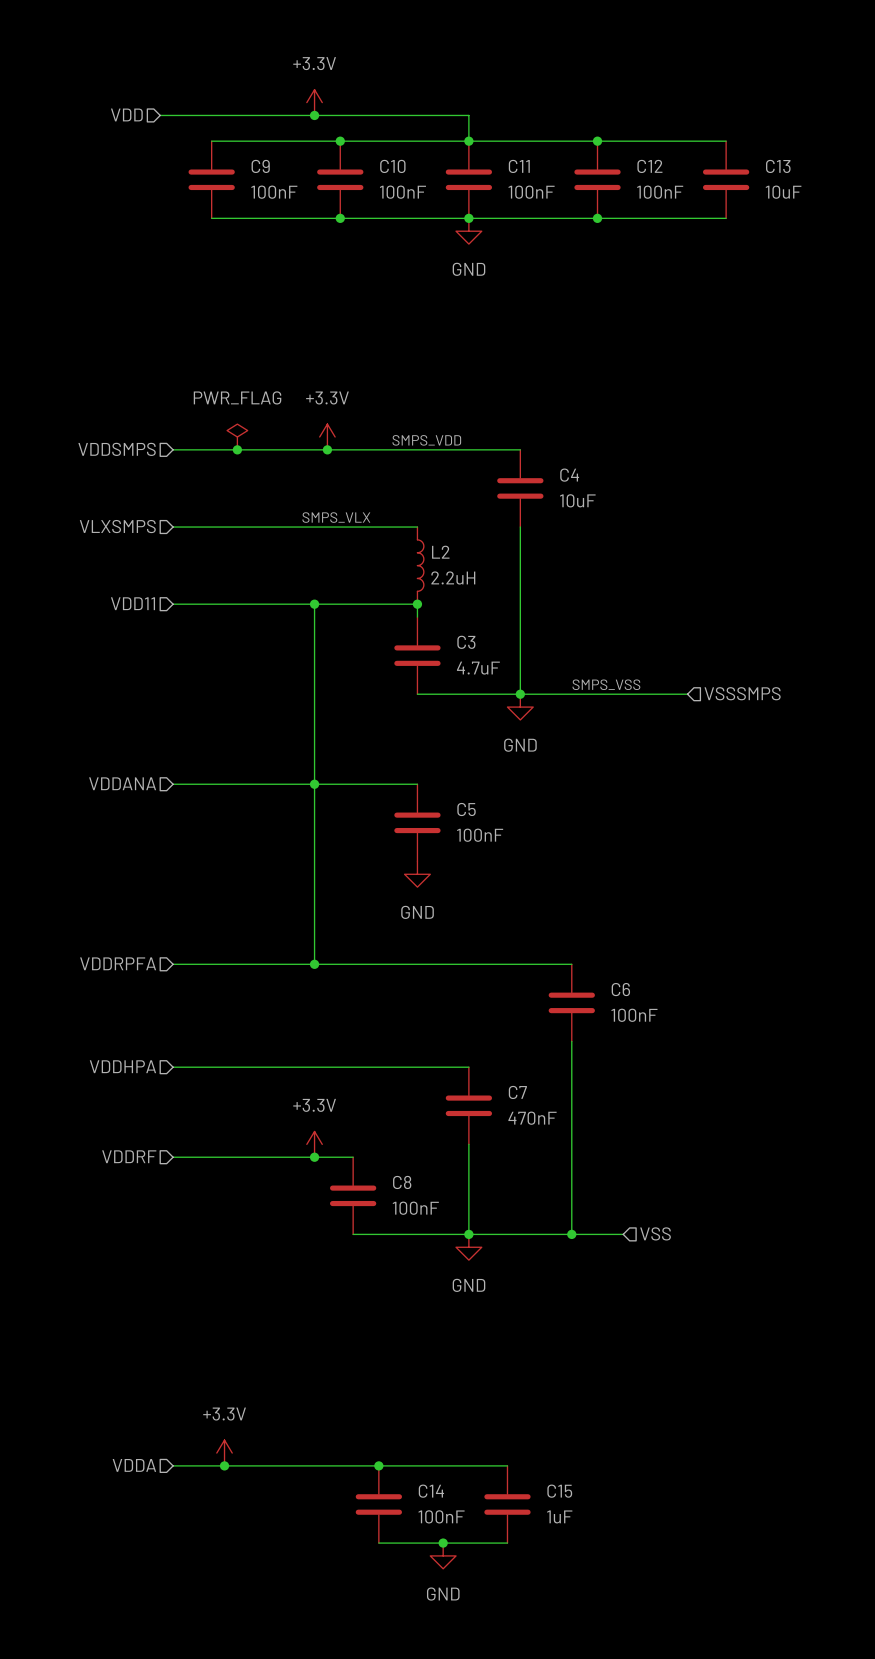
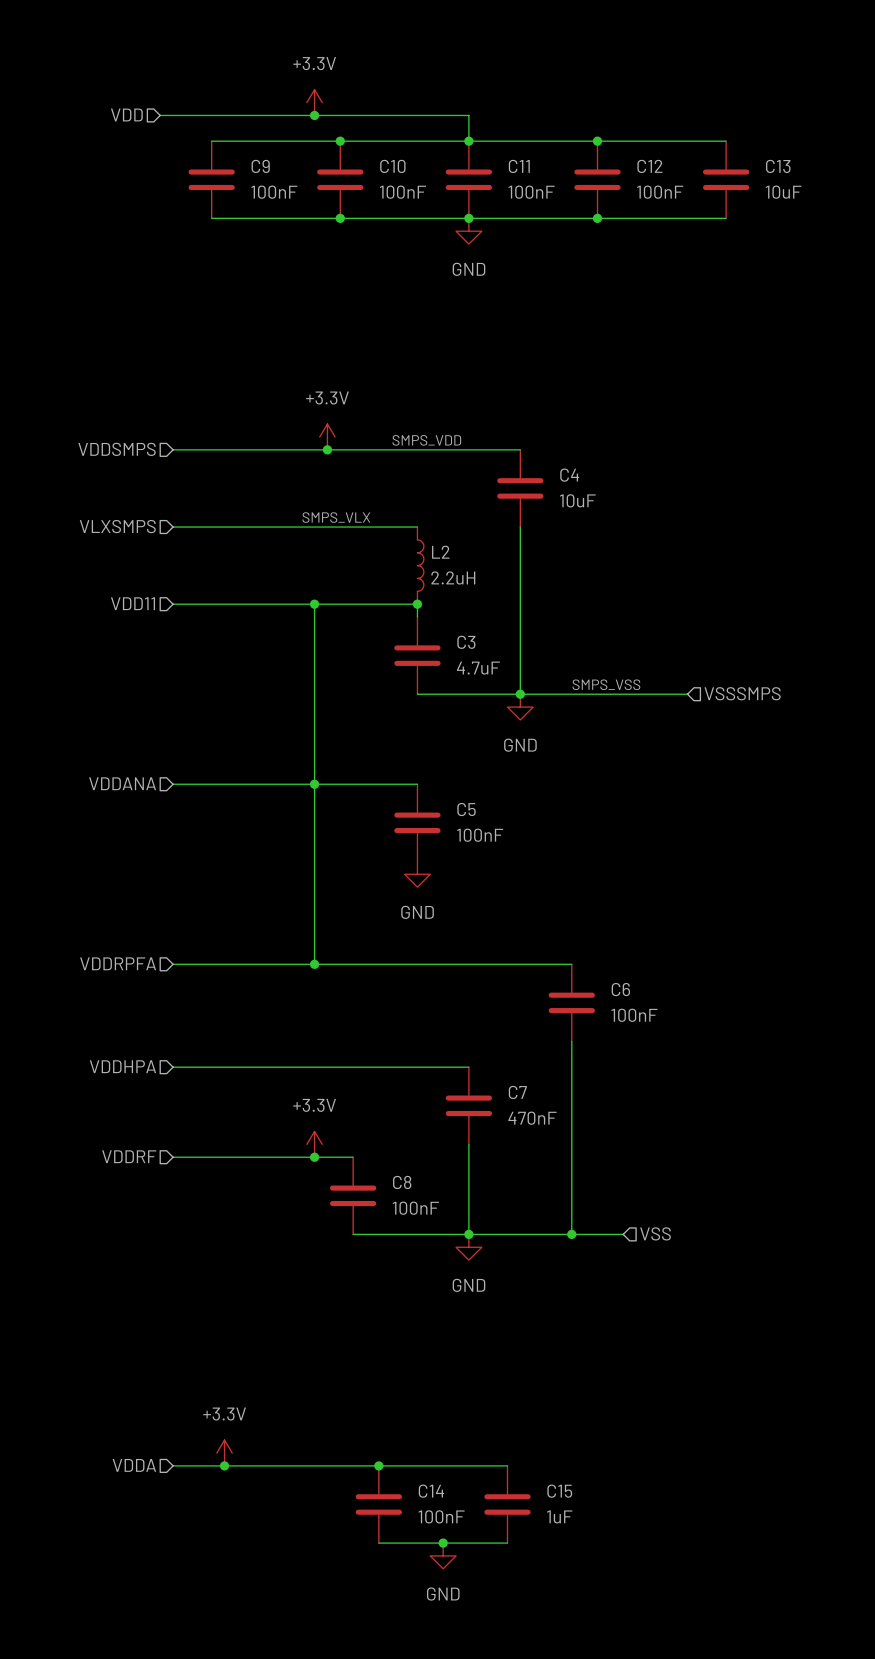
power symbol: PWR_FLAG (237, 436) -> none
junction: (237, 449) -> none

